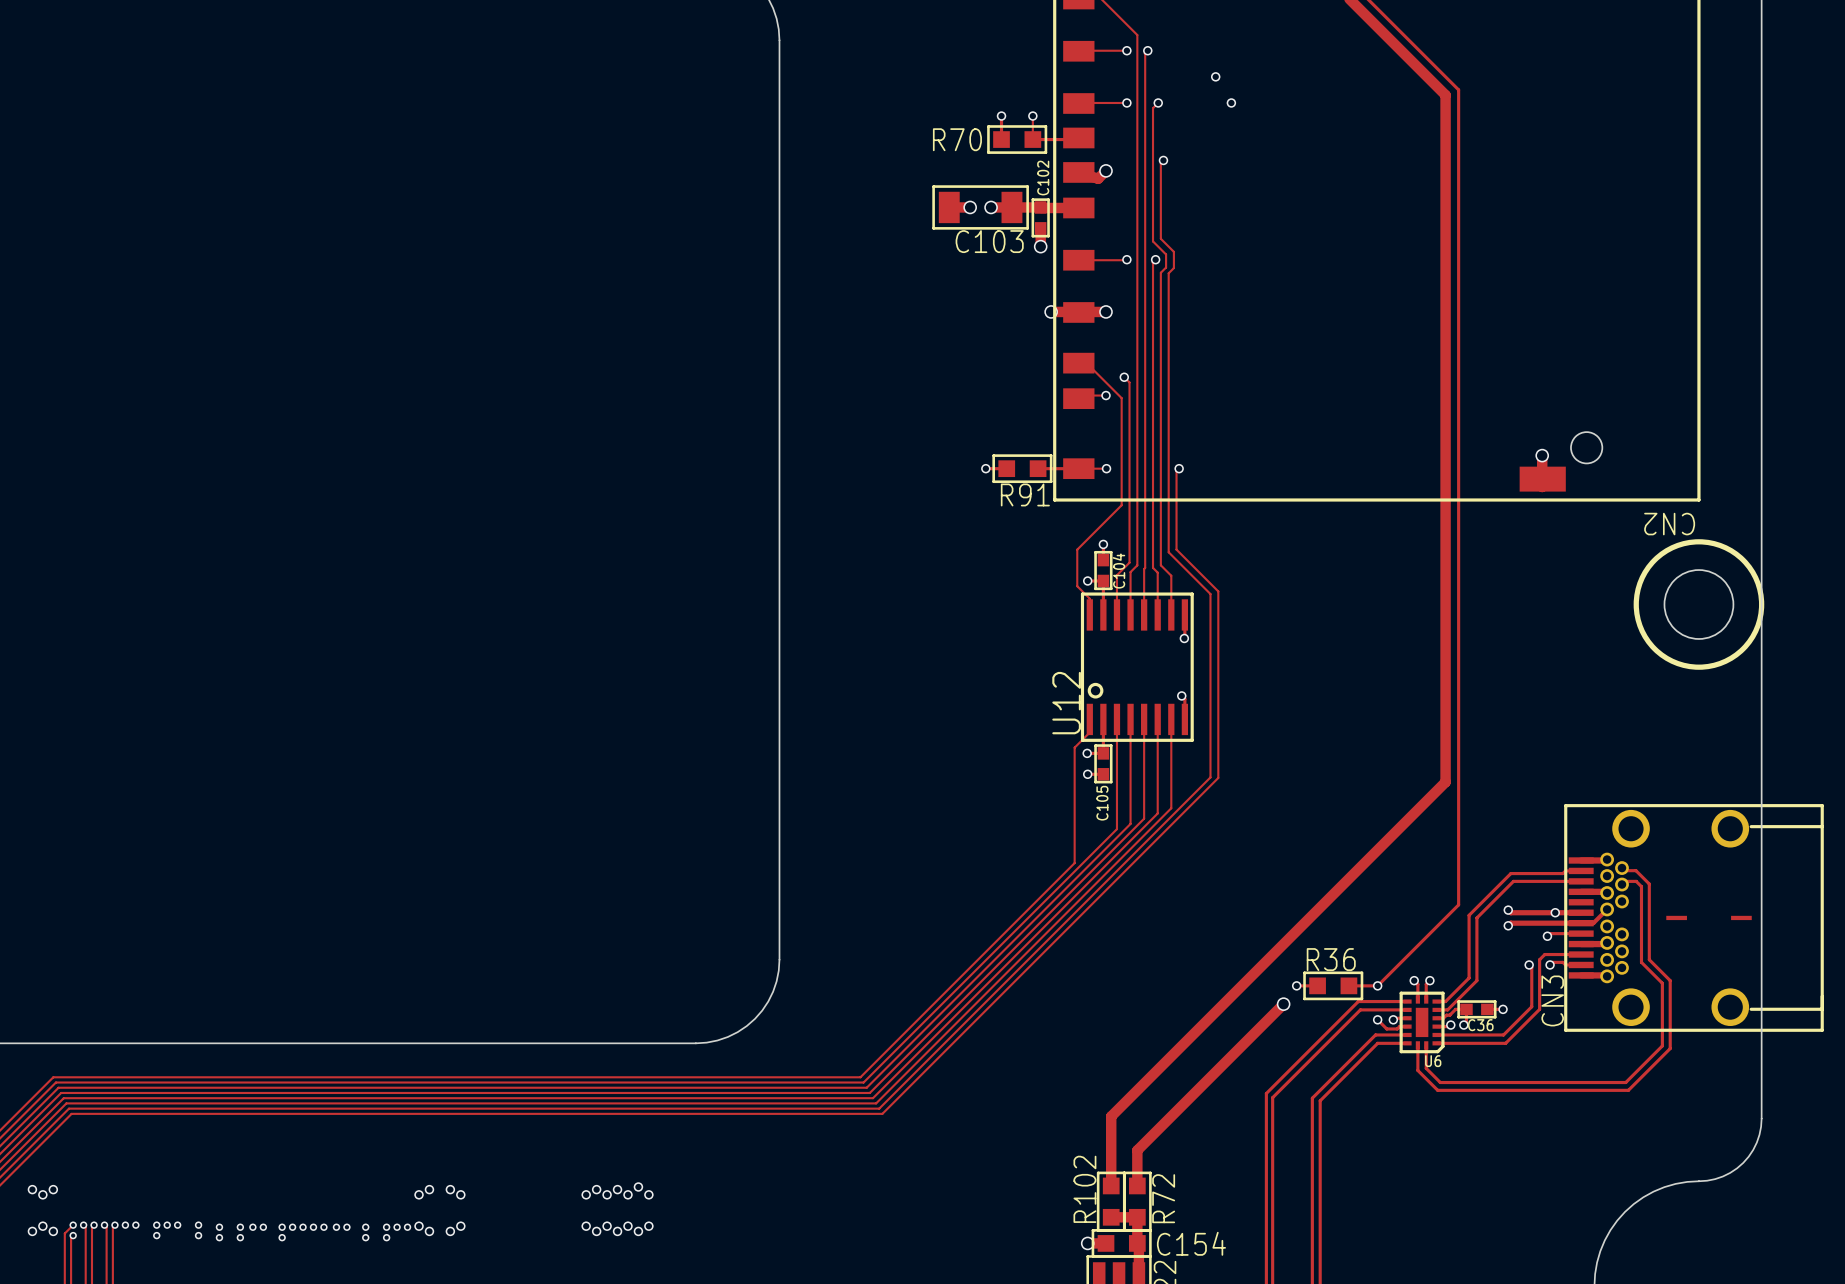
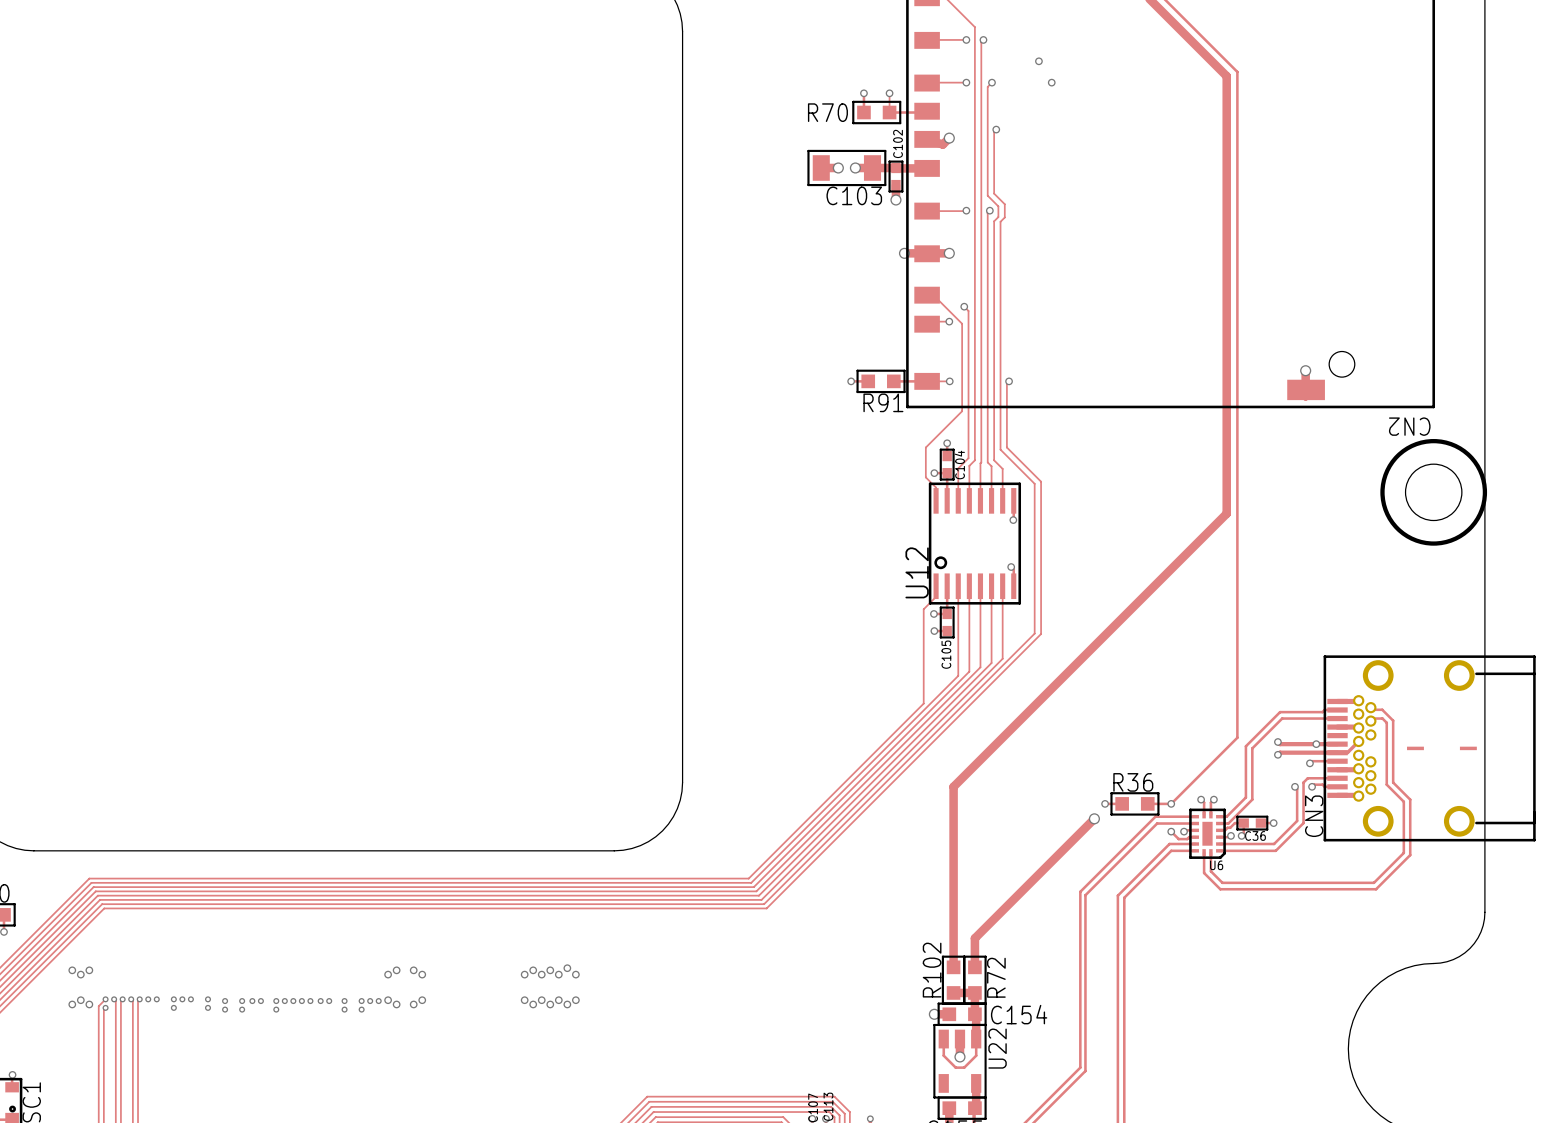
track: (1445, 630) (1445, 782) (1111, 1116) -> (1226, 513) (953, 786) (953, 910)

